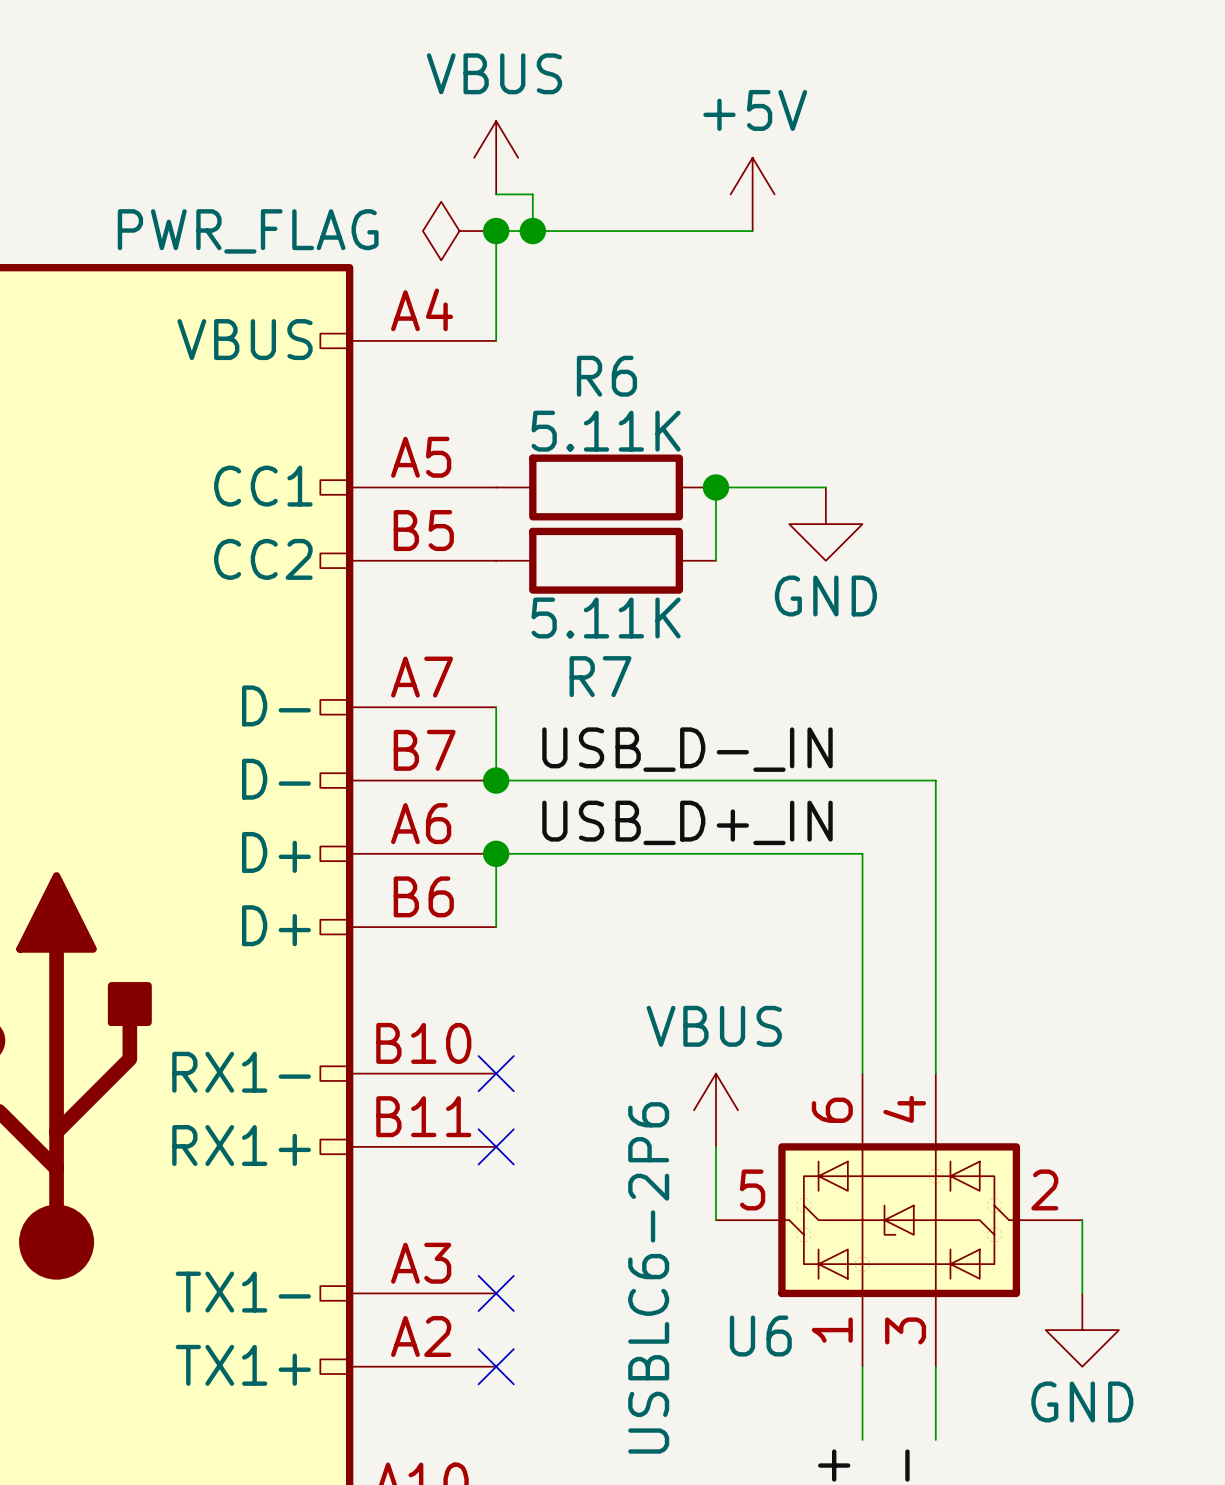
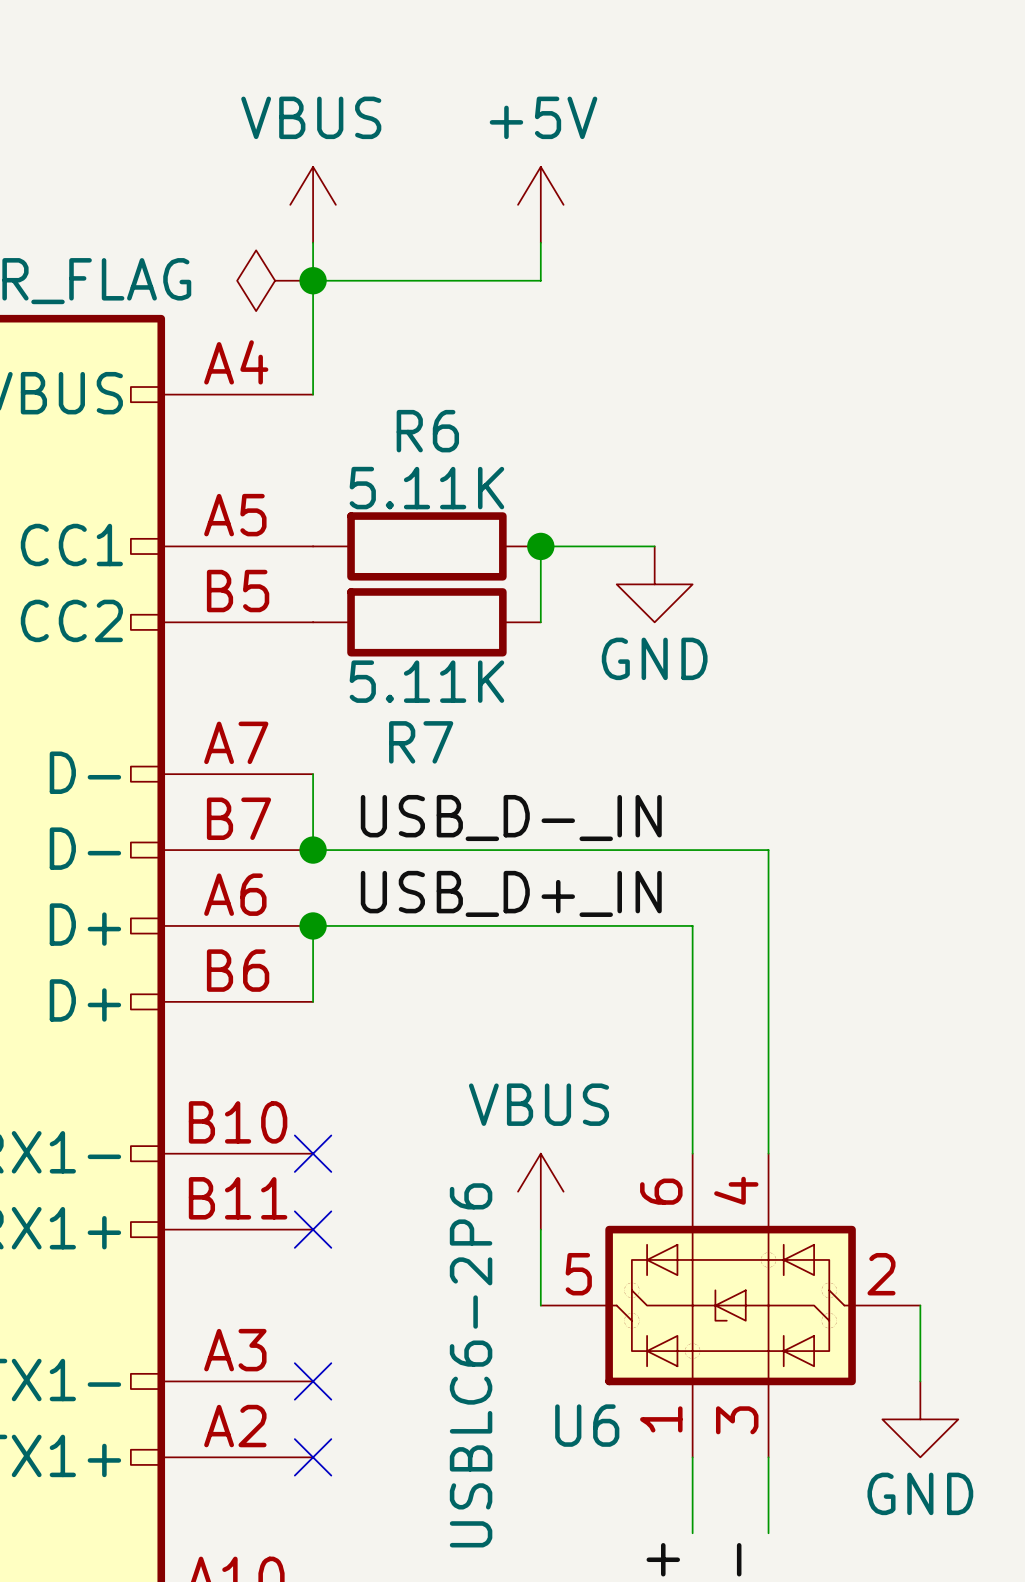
wire: (496, 194) (532, 194) (532, 231) -> (313, 242) (313, 280)
power symbol position: +5V (752, 194) -> +5V (540, 204)
junction: (532, 231) -> none
wire: (715, 231) (752, 231) -> (540, 280) (540, 242)

